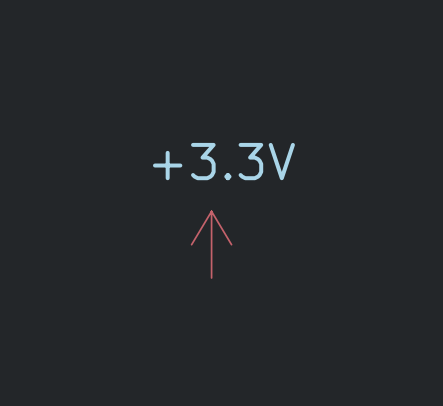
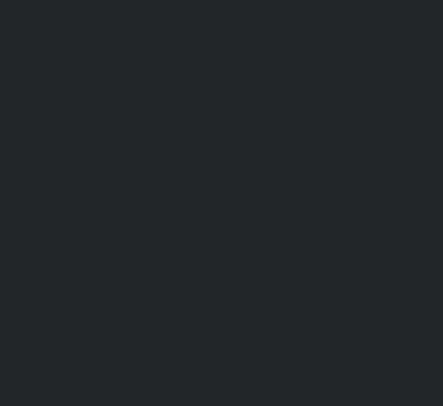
power symbol: +3.3V (211, 244) -> none

